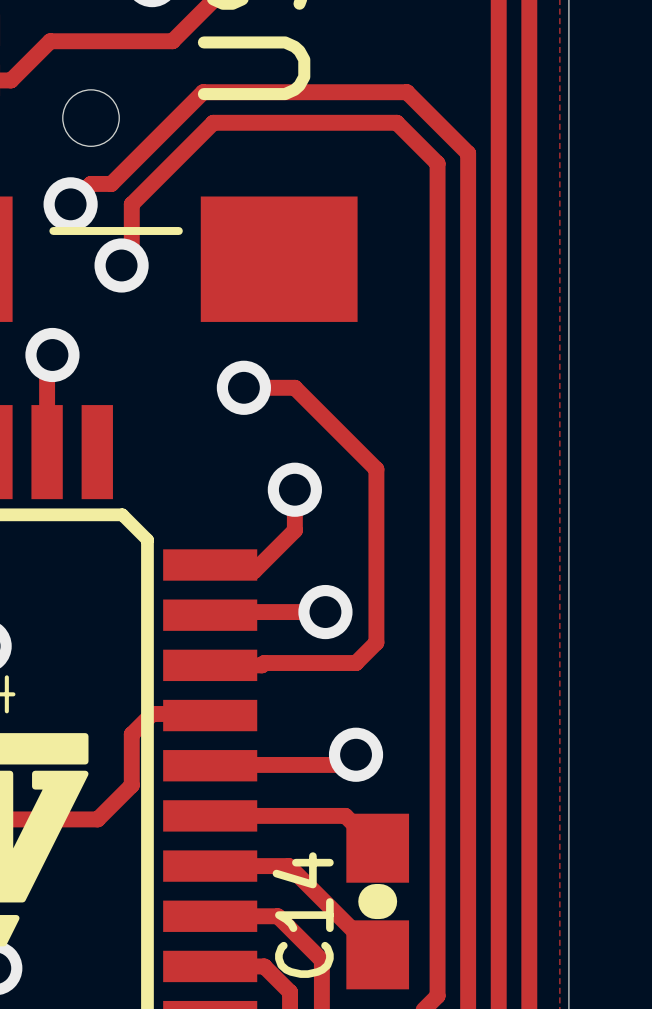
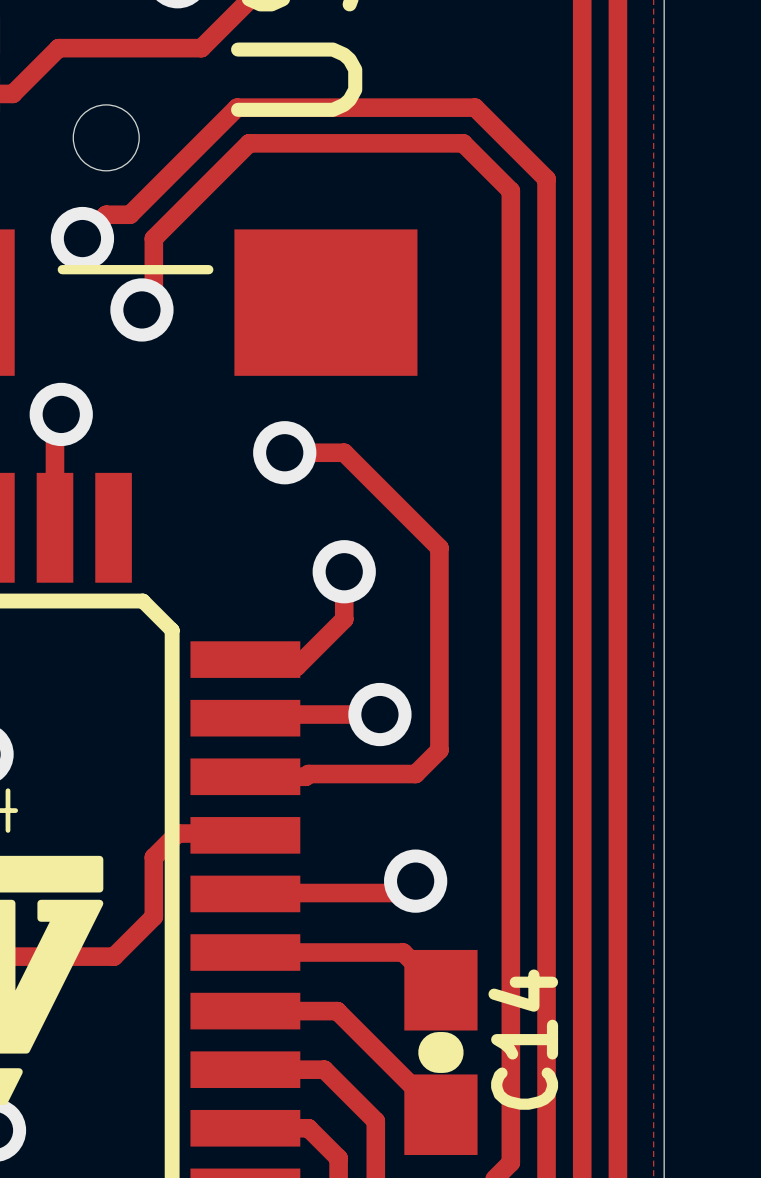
C14 name position: C14 (303, 915) -> C14 (523, 1039)

